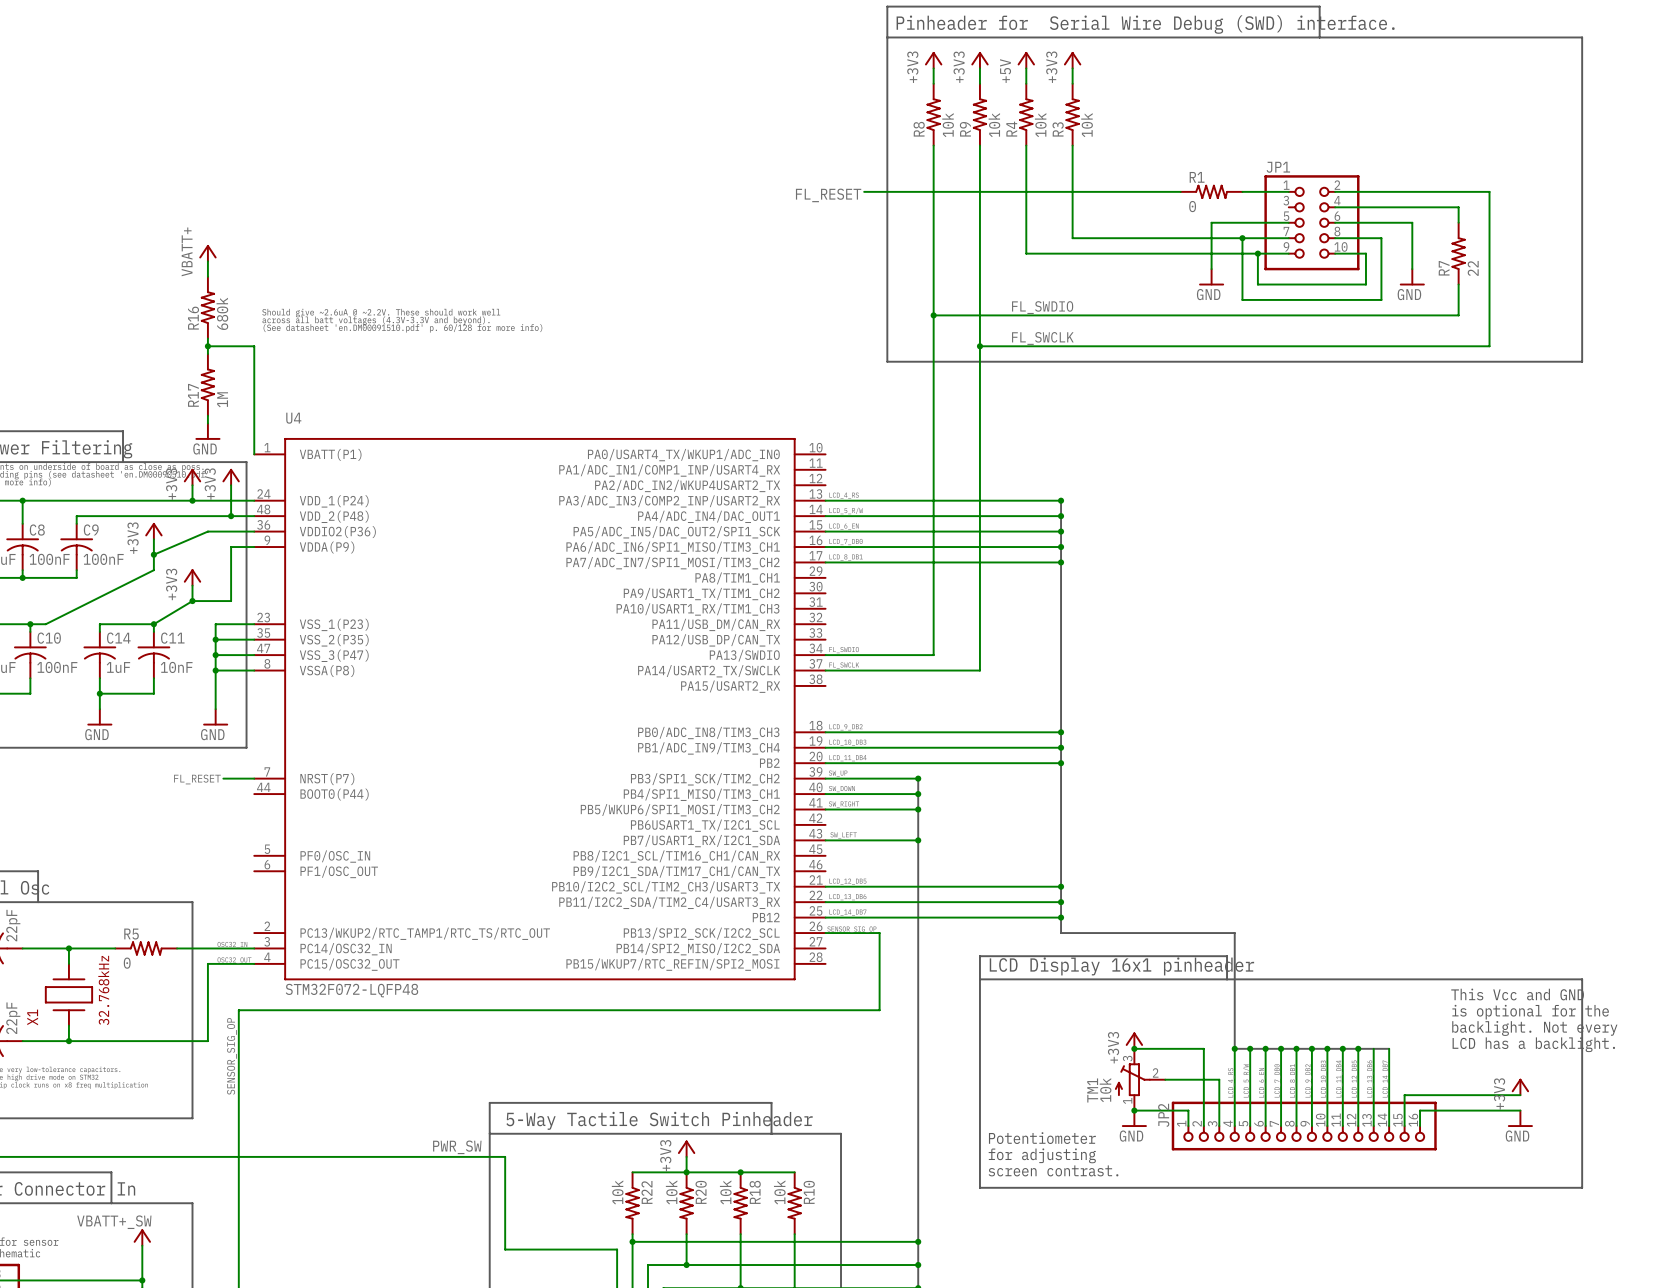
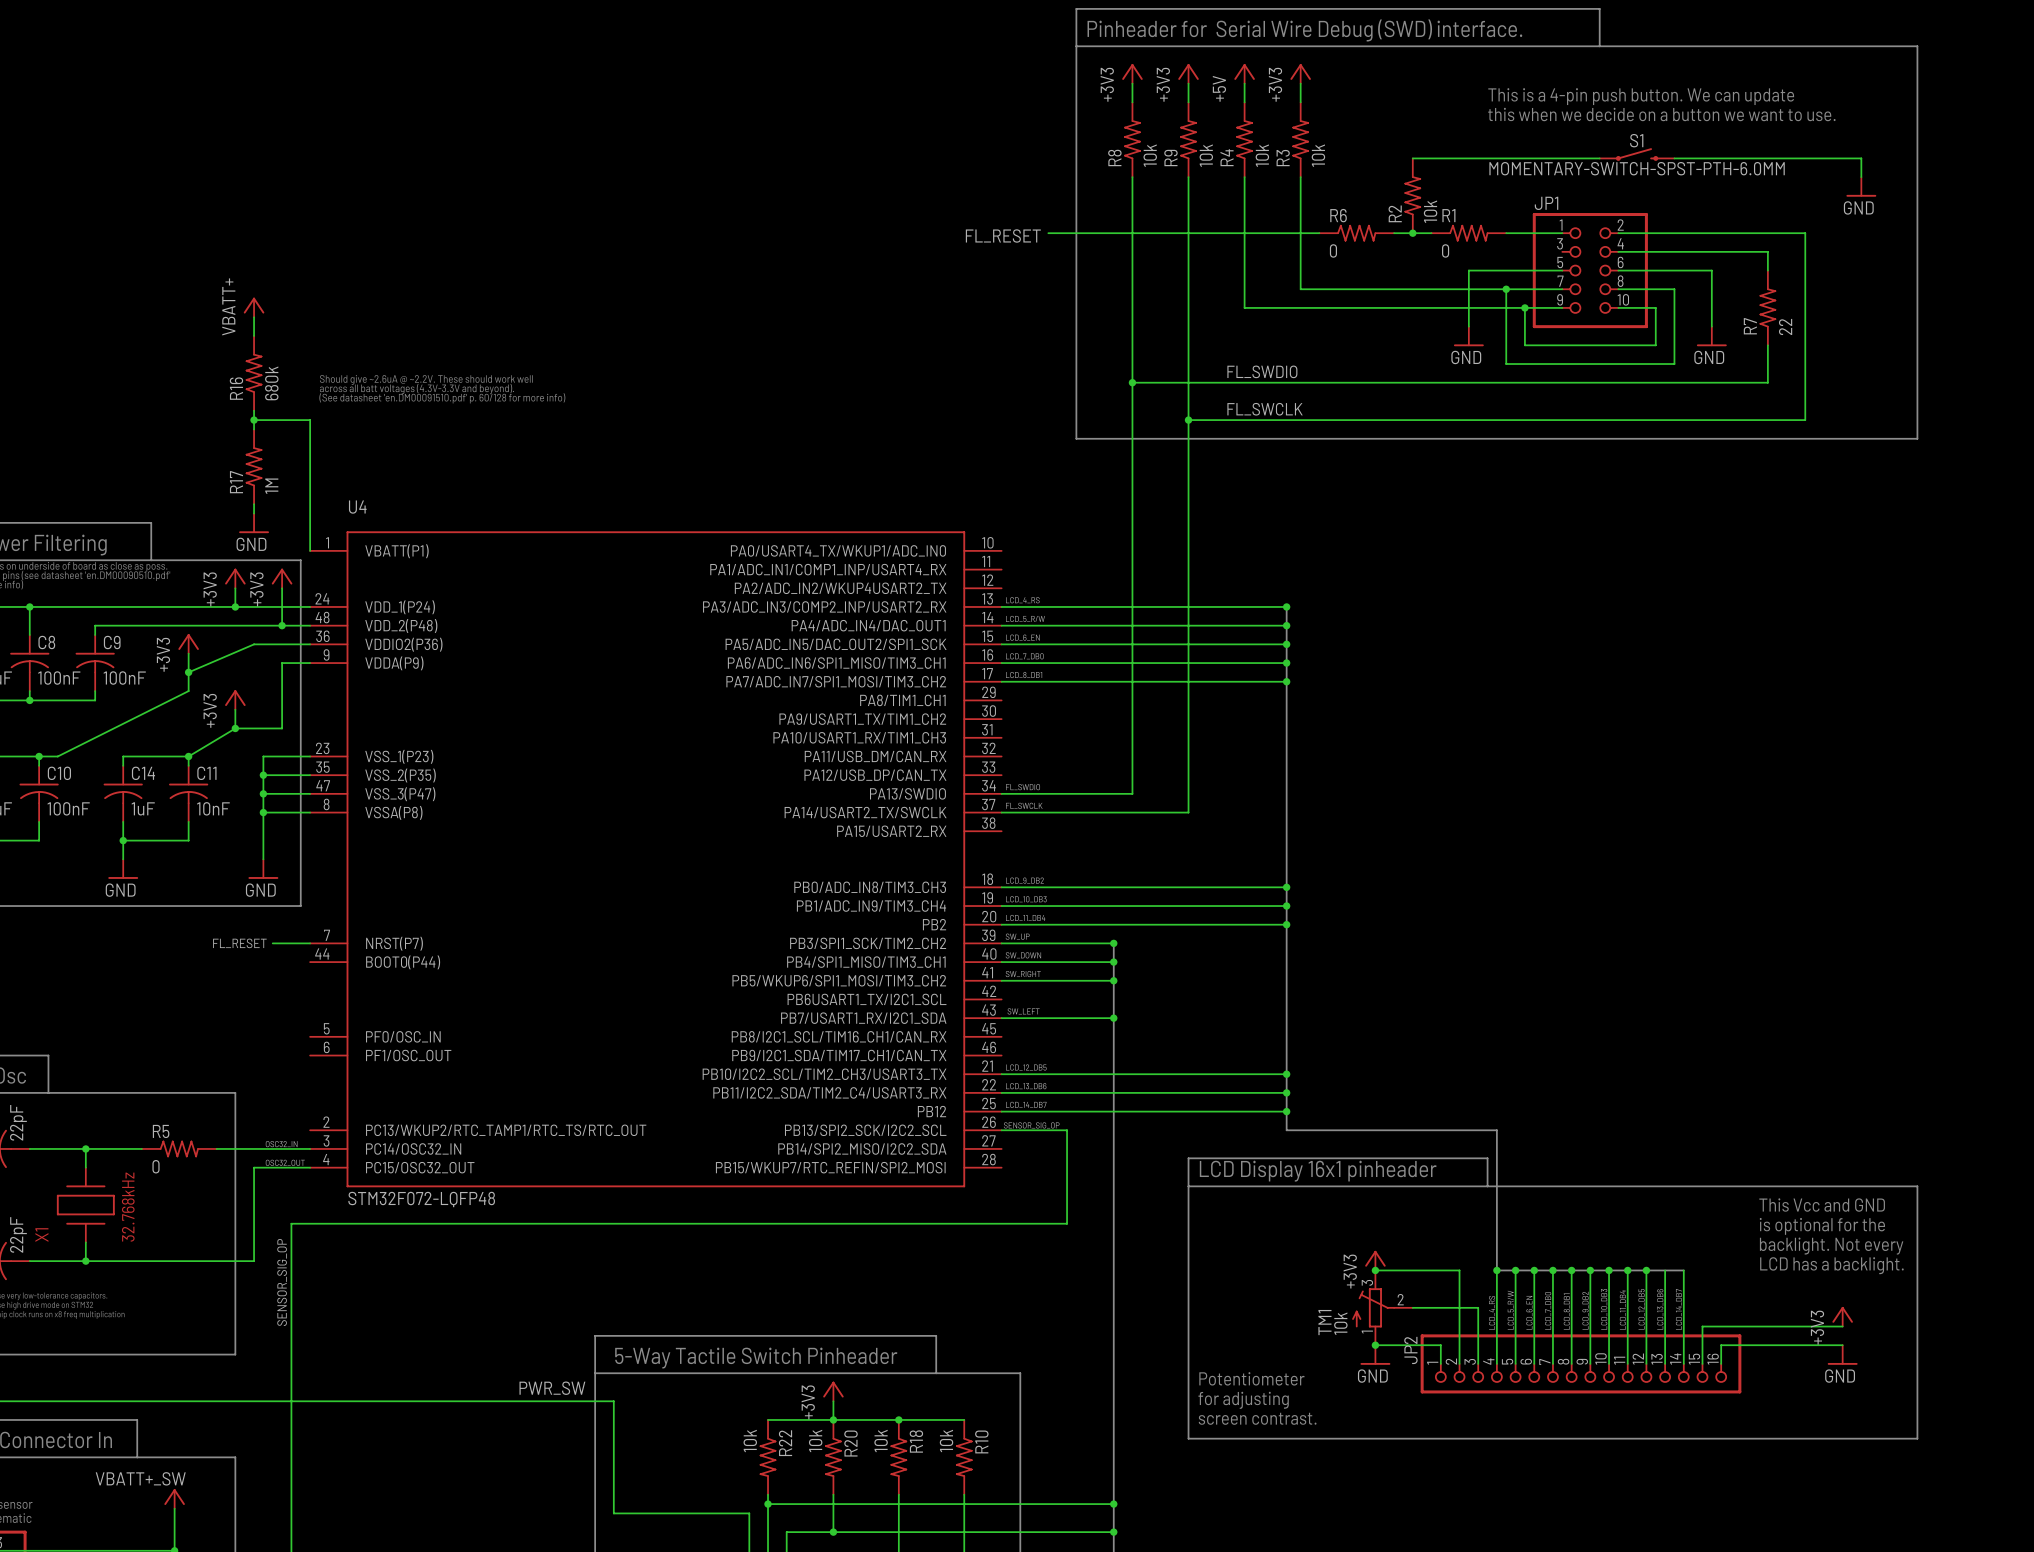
text: none -> This is a 4-pin push button. We can update (1641, 96)
text: none -> this when we decide on a button we want to use. (1661, 114)
S1: none -> MOMENTARY-SWITCH-SPST-PTH-6.0MM (1637, 154)
wire: none -> (1412, 158) (1599, 158)
wire: none -> (1674, 158) (1861, 158) (1861, 177)
power symbol: none -> GND (1861, 186)
R2: none -> 10k (1412, 195)
R6: none -> 0 (1356, 233)
junction: none -> (1412, 233)

